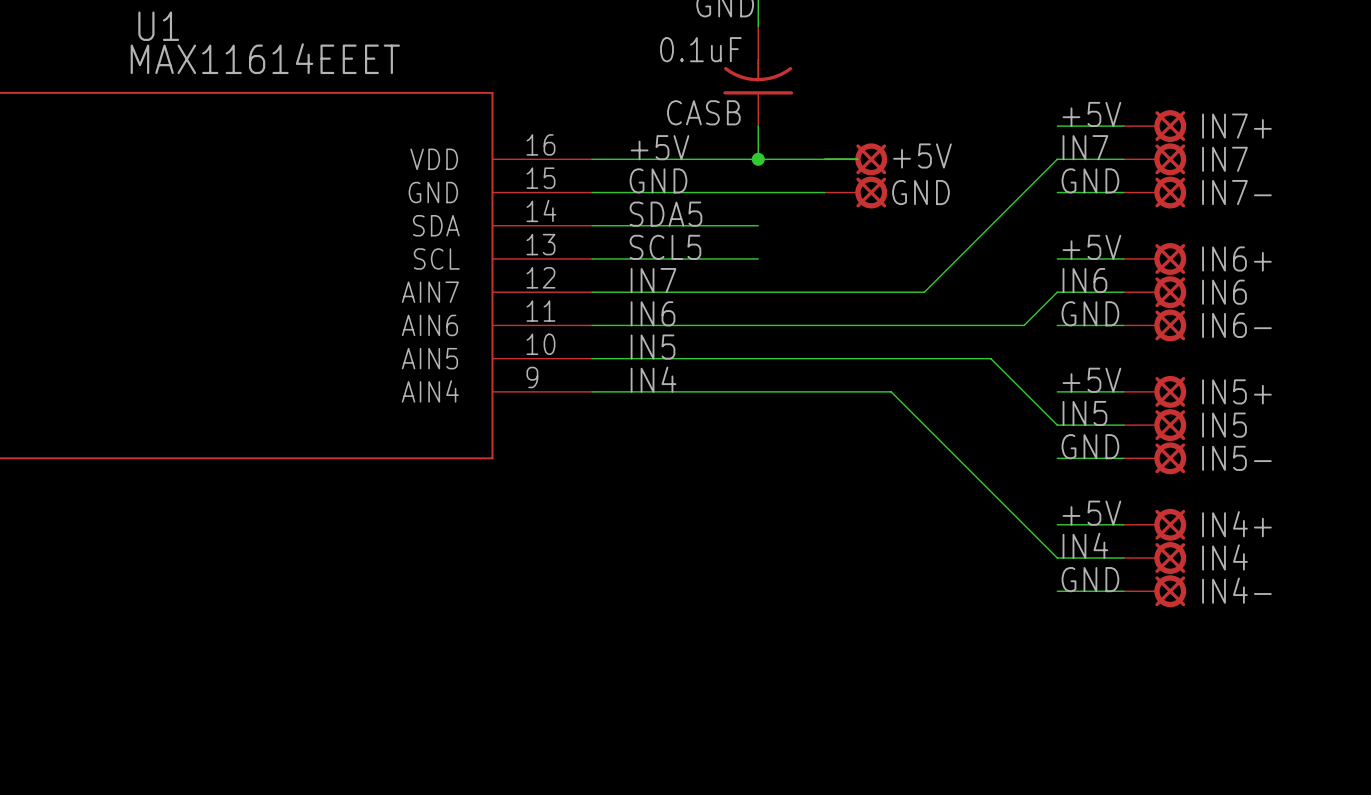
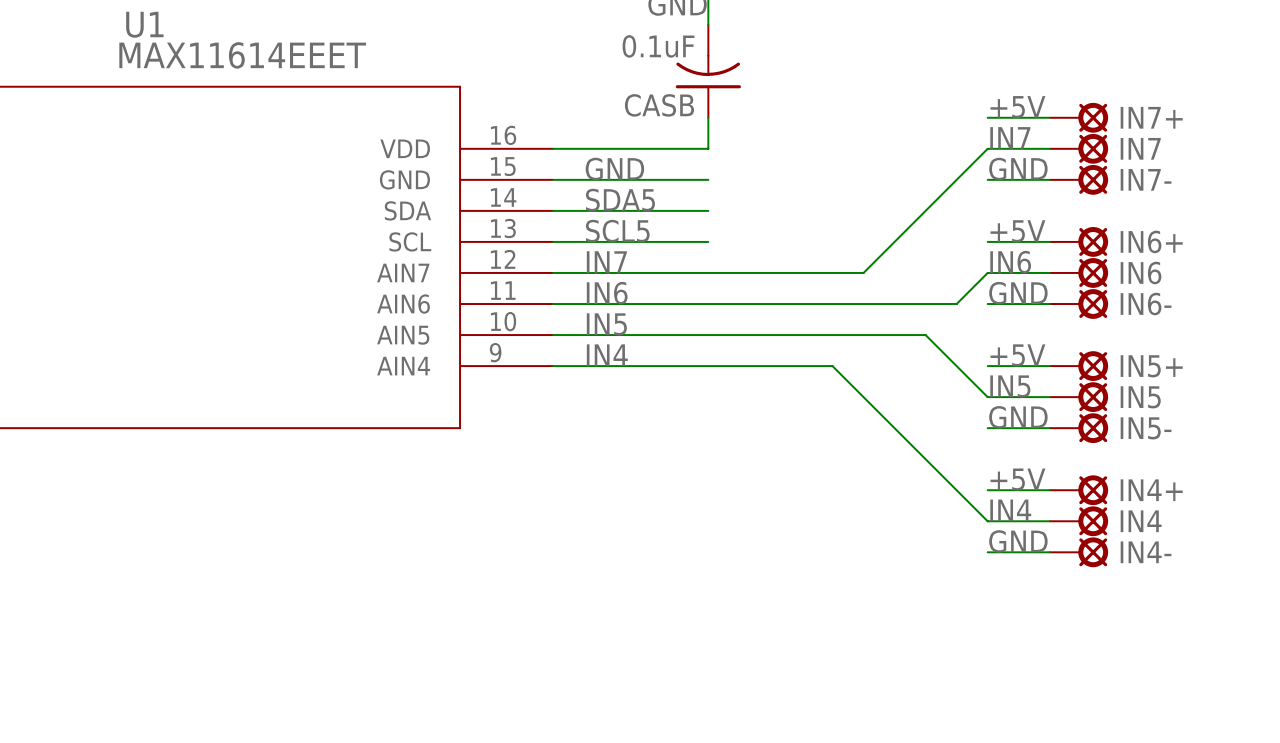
label: +5V (659, 147) -> none
wire: (758, 159) (857, 159) -> none
junction: (758, 159) -> none
+5V: (855, 159) -> none
wire: (758, 192) (824, 192) -> none
GND: (855, 192) -> none

